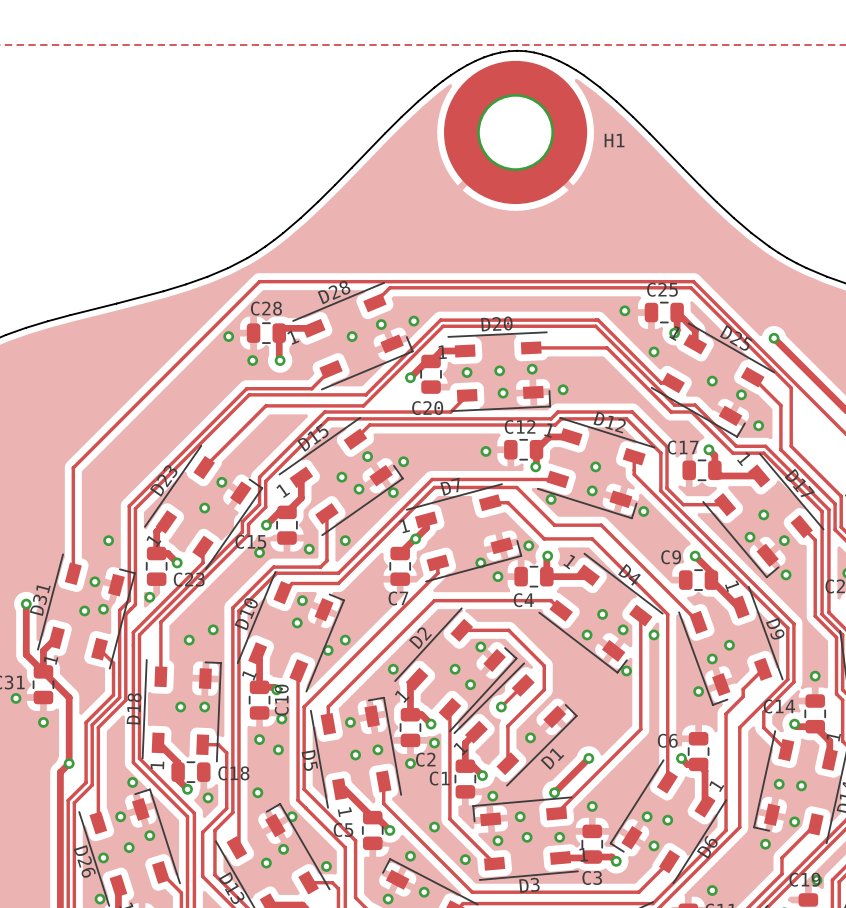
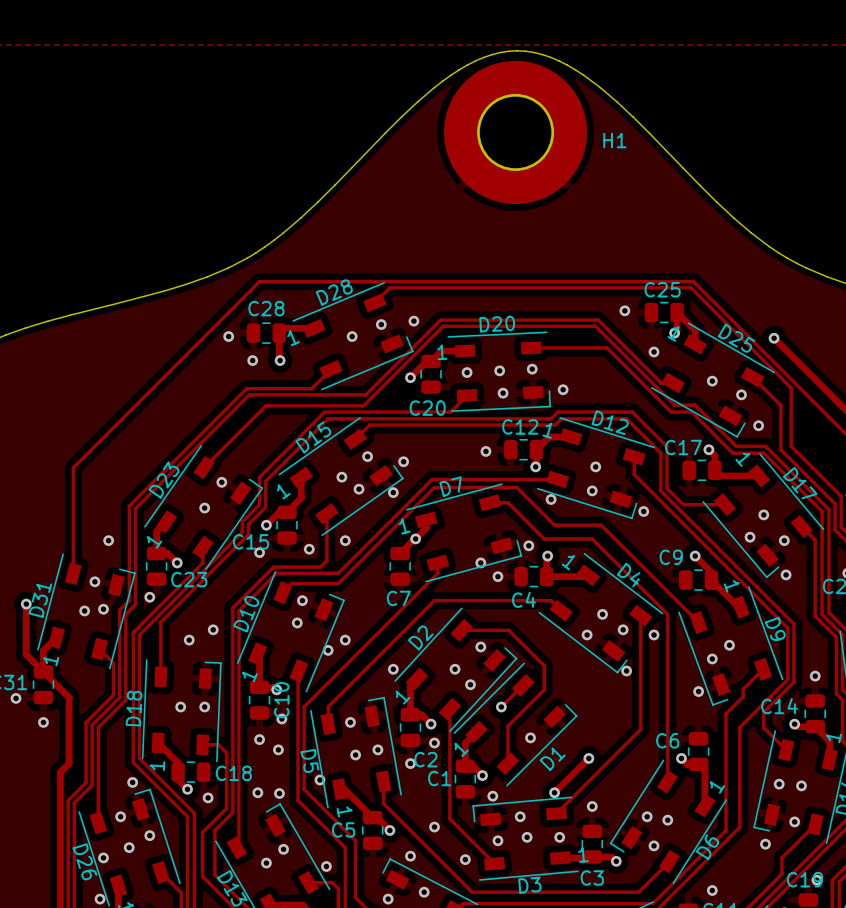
via: (69, 763) -> none
via: none -> (319, 780)
via: none -> (279, 793)
via: (292, 816) -> none

